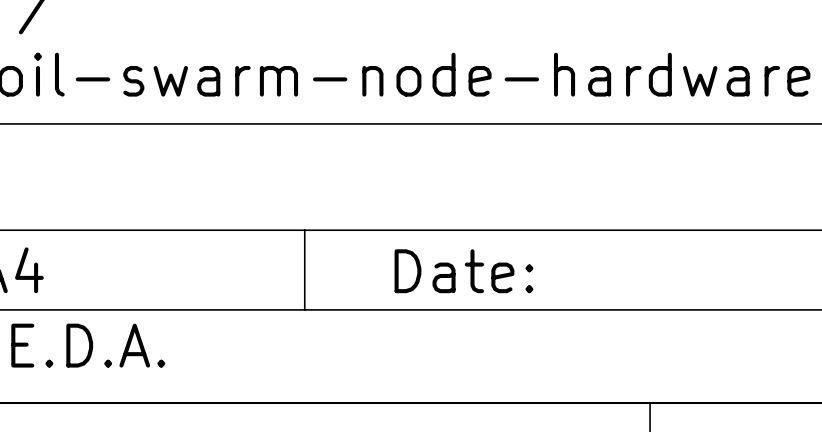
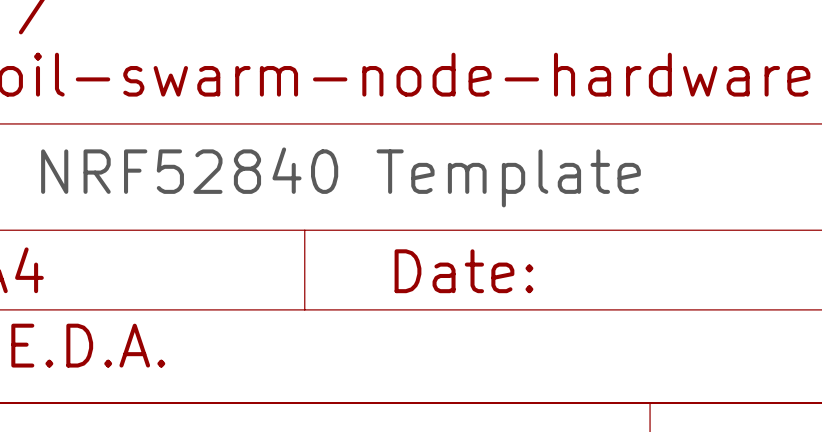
text: none -> NRF52840 Template (340, 177)

